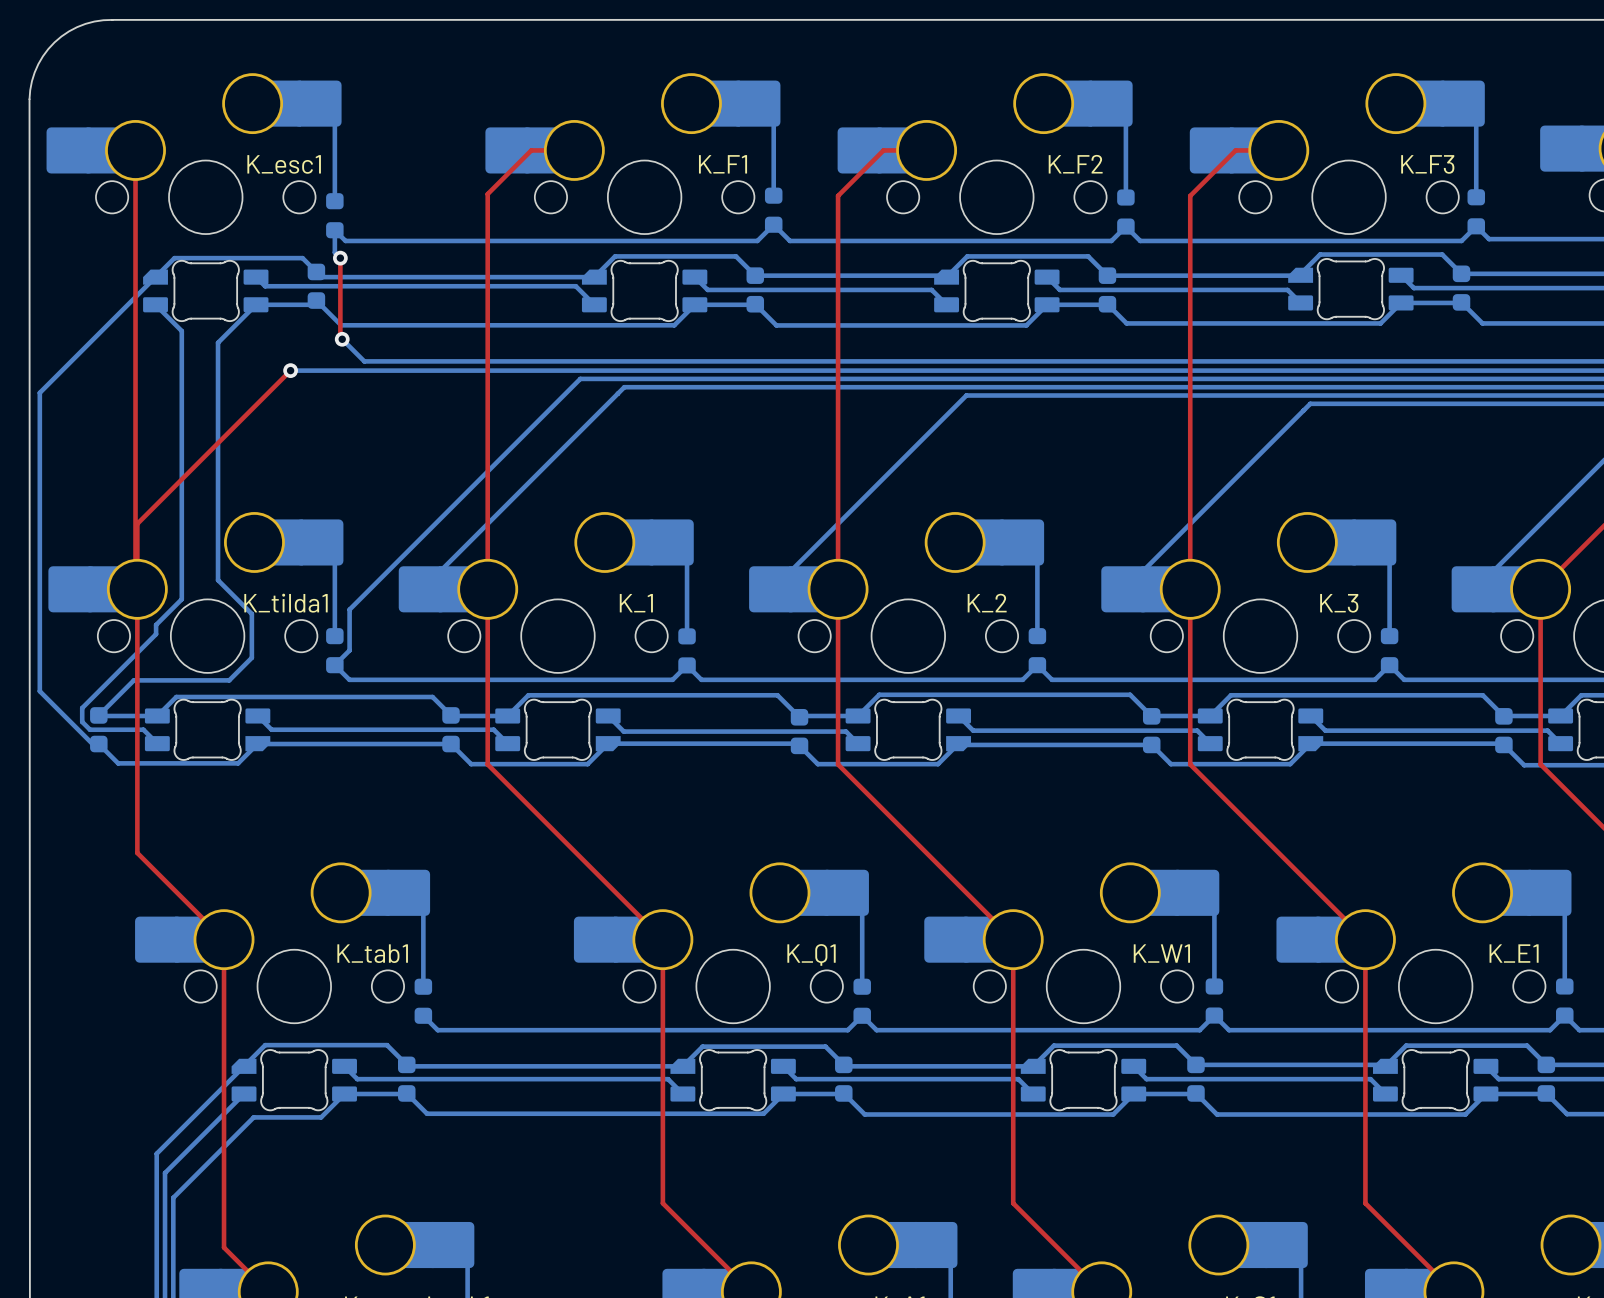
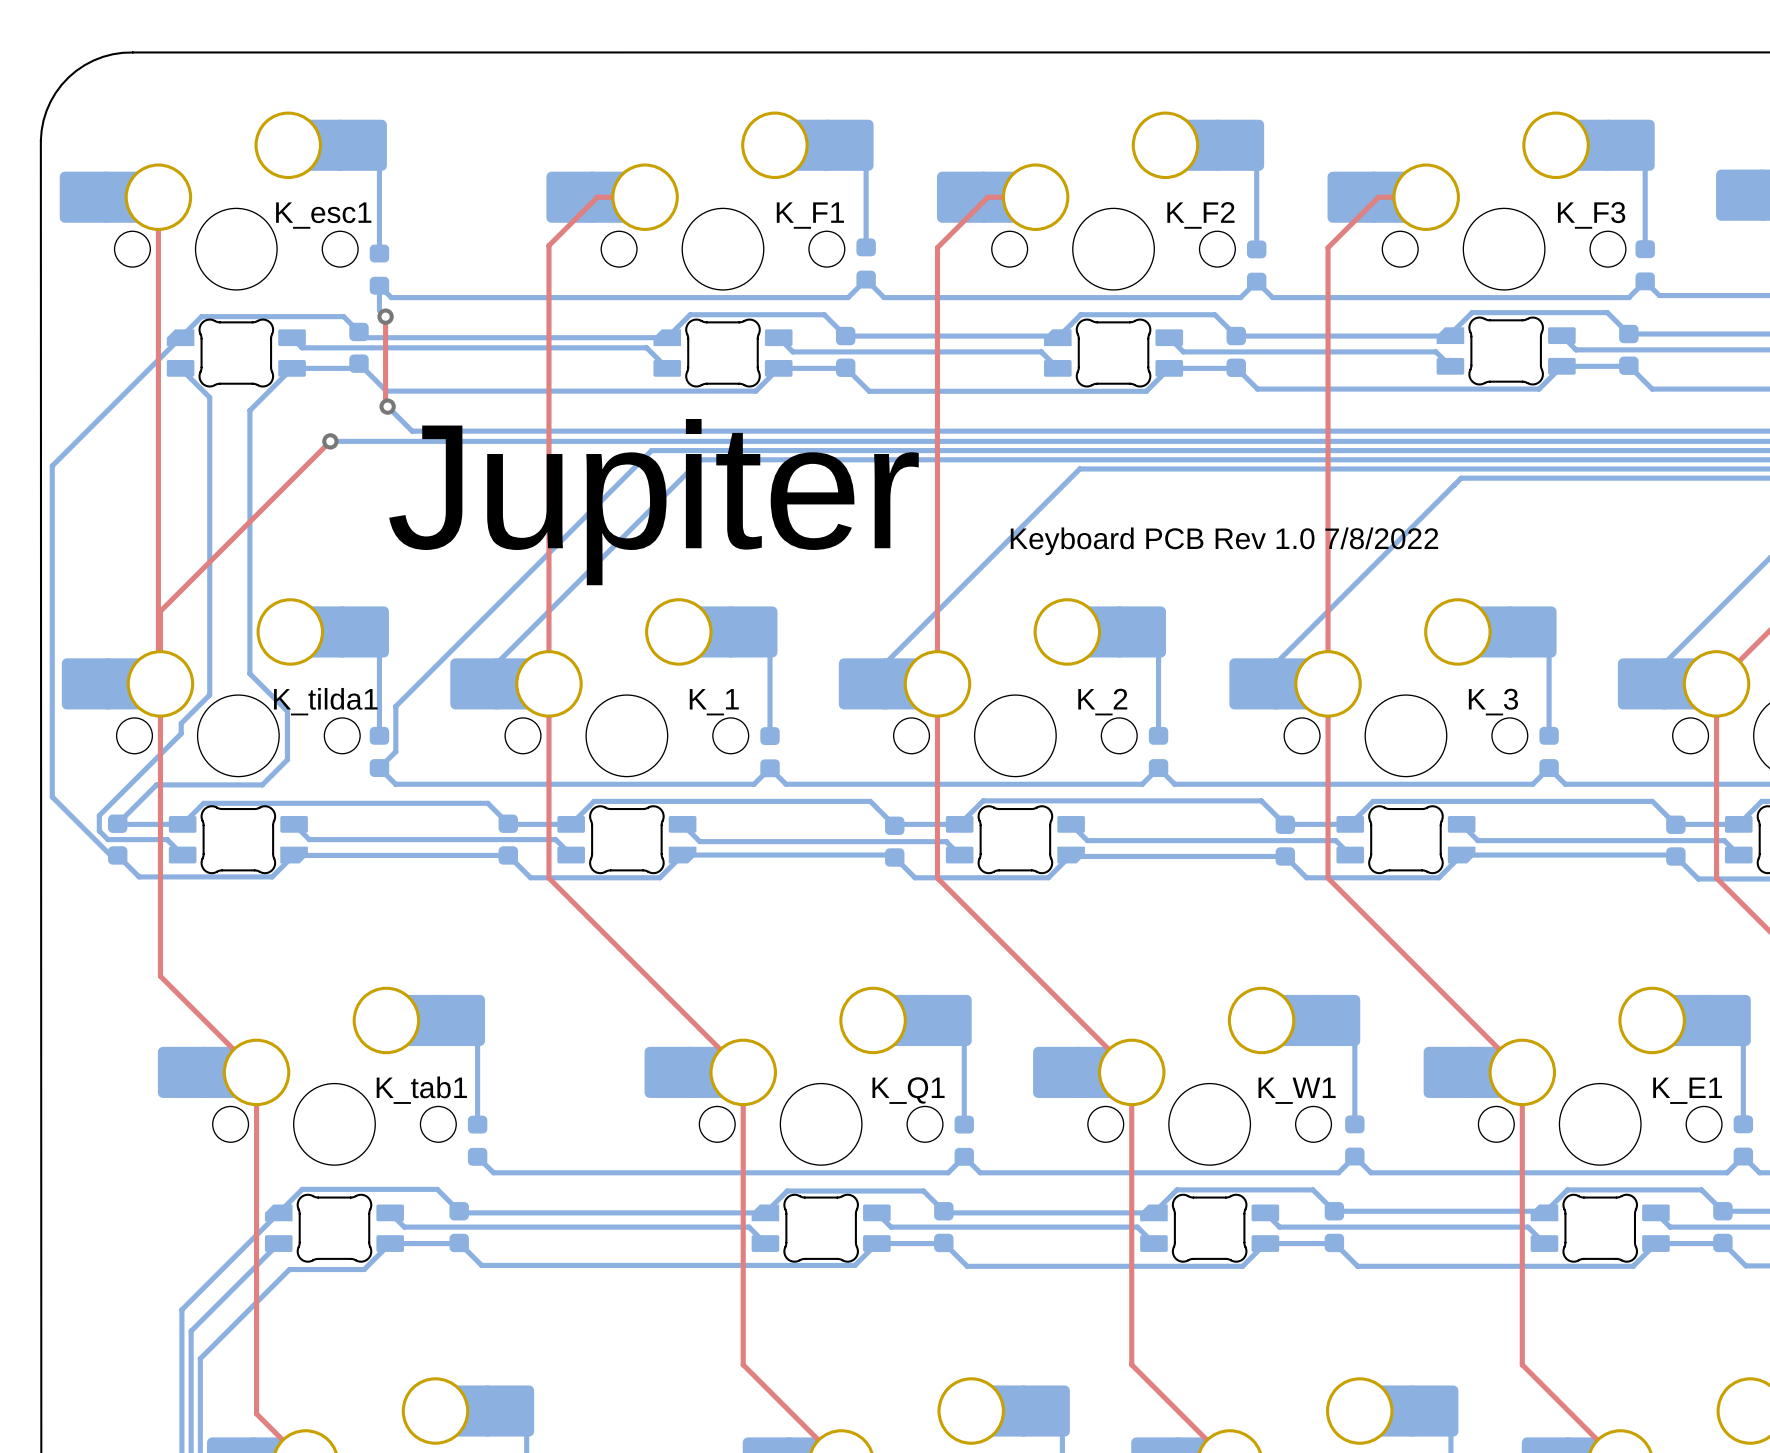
text: none -> Jupiter (653, 502)
text: none -> Keyboard PCB Rev 1.0 7/8/2022 (1224, 541)

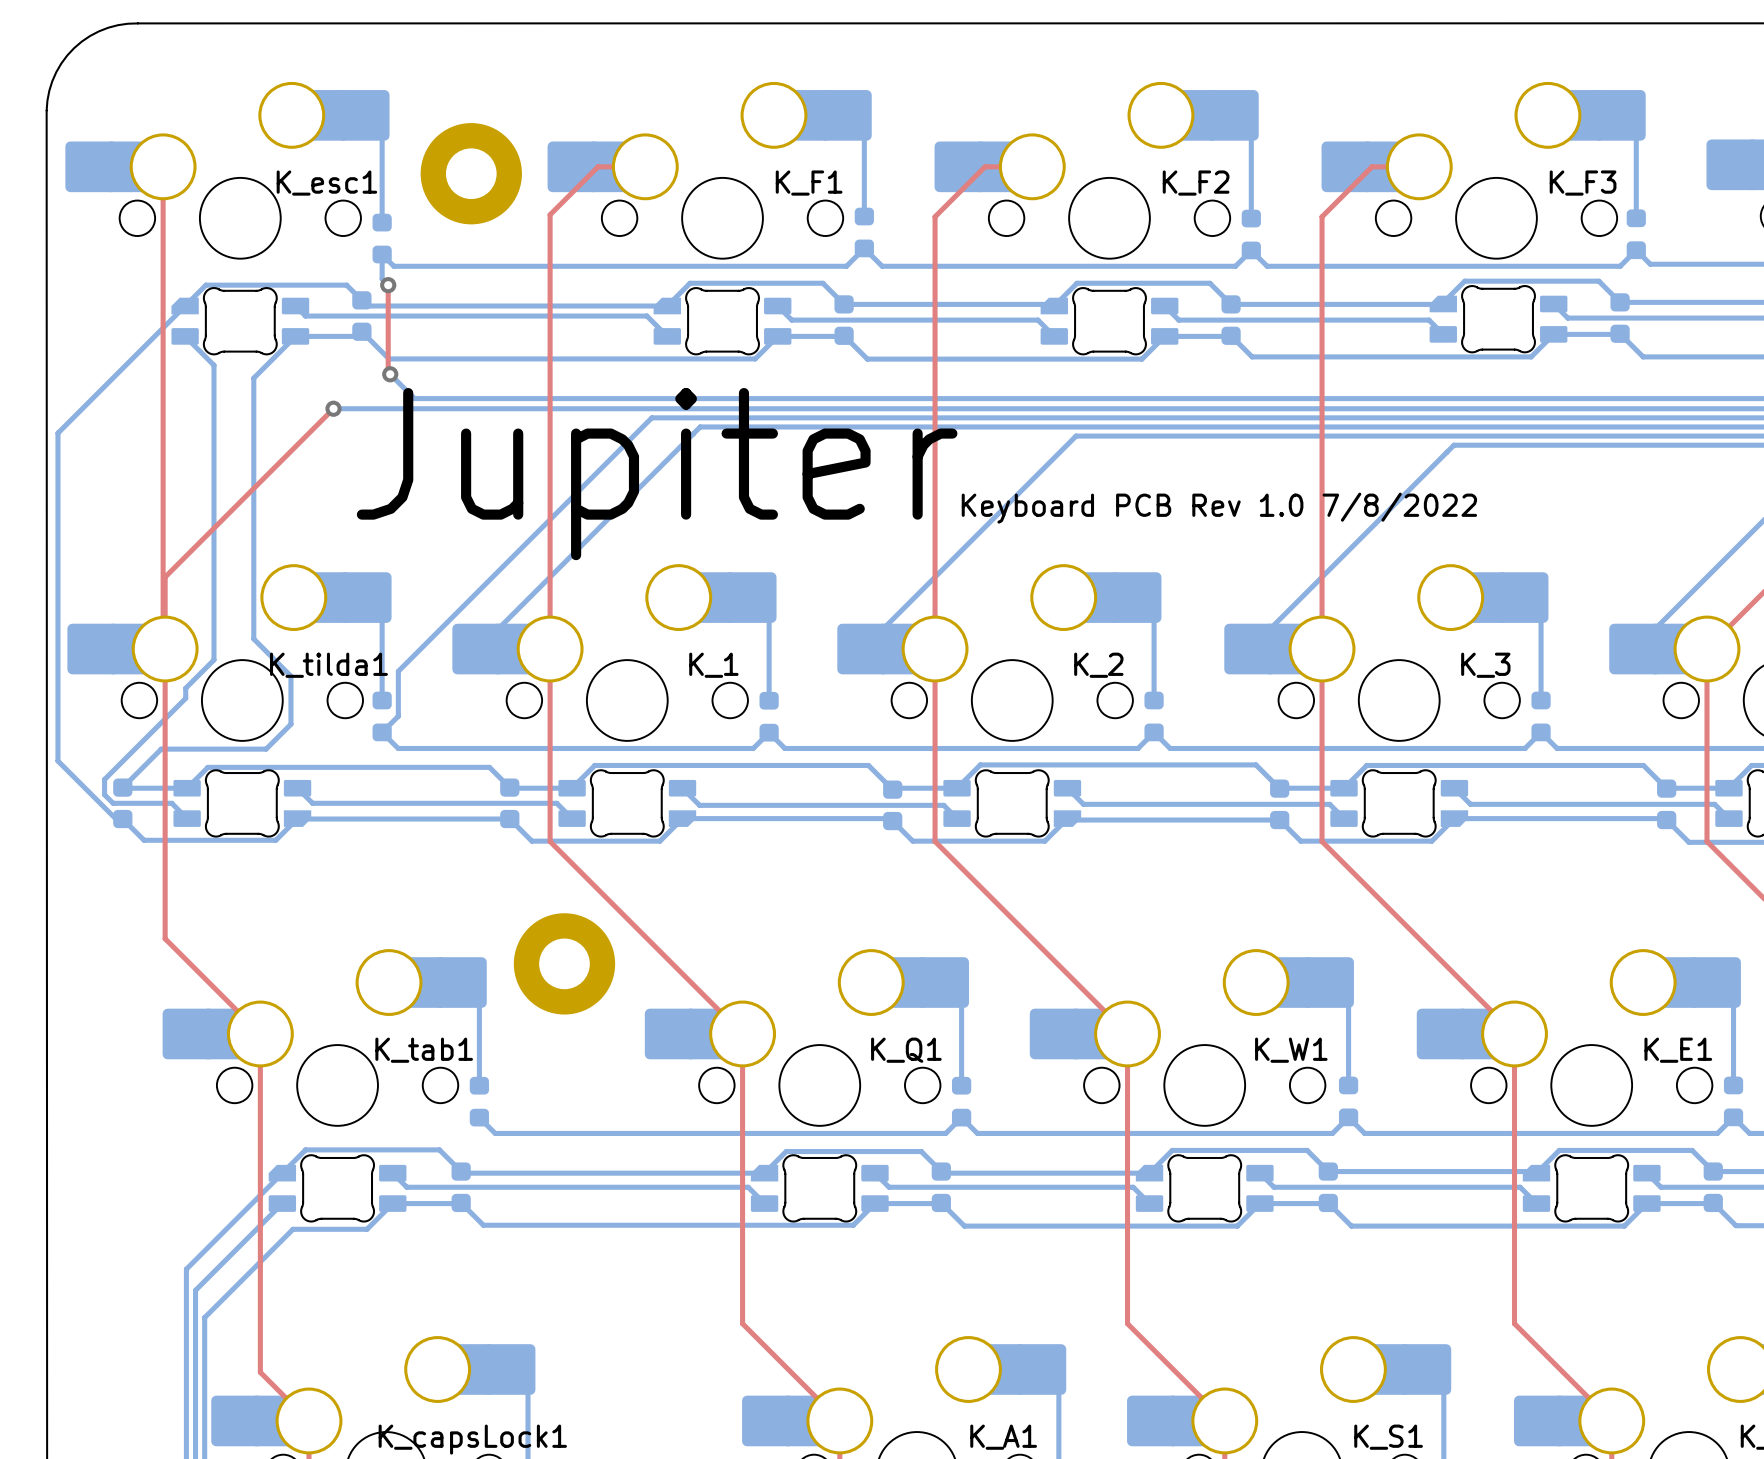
part: none -> (471, 173)
part: none -> (564, 963)

